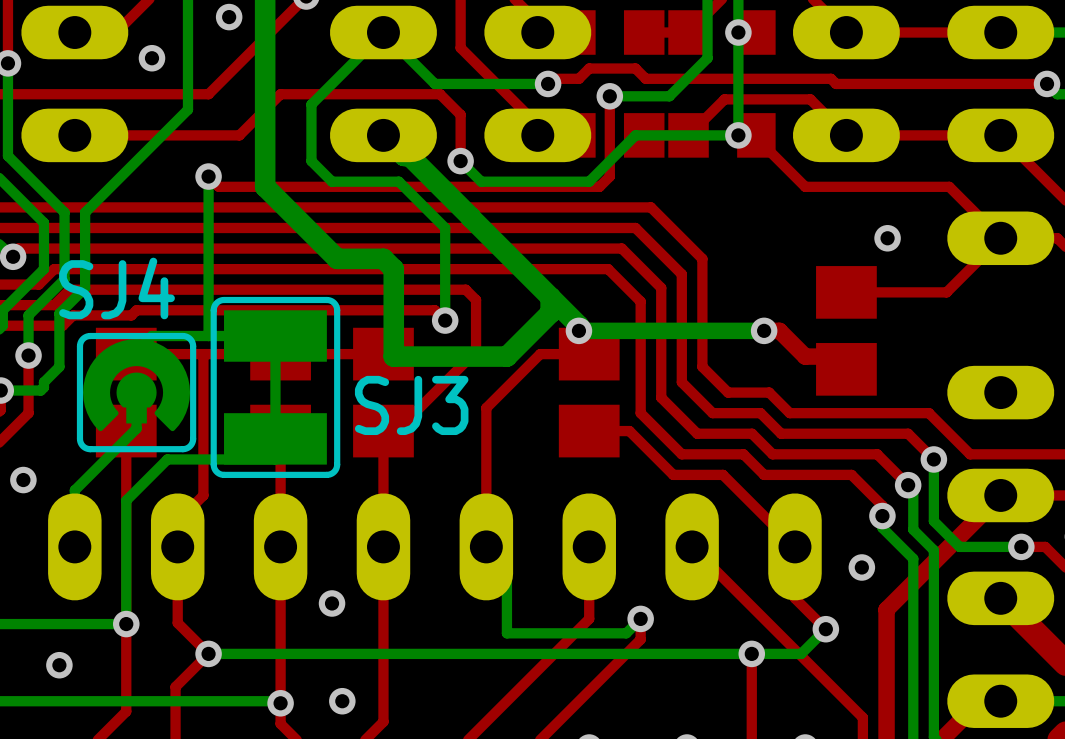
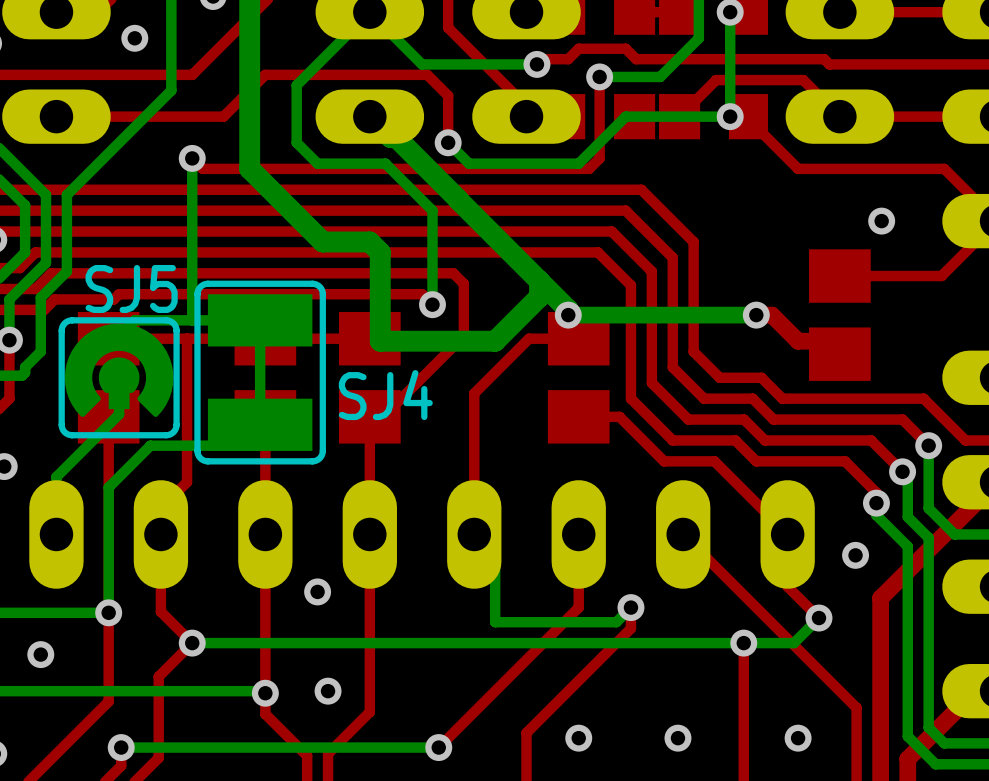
SJ4 name: SJ4 (117, 288) -> SJ5 (131, 289)
SJ3 name: SJ3 (411, 405) -> SJ4 (385, 395)

